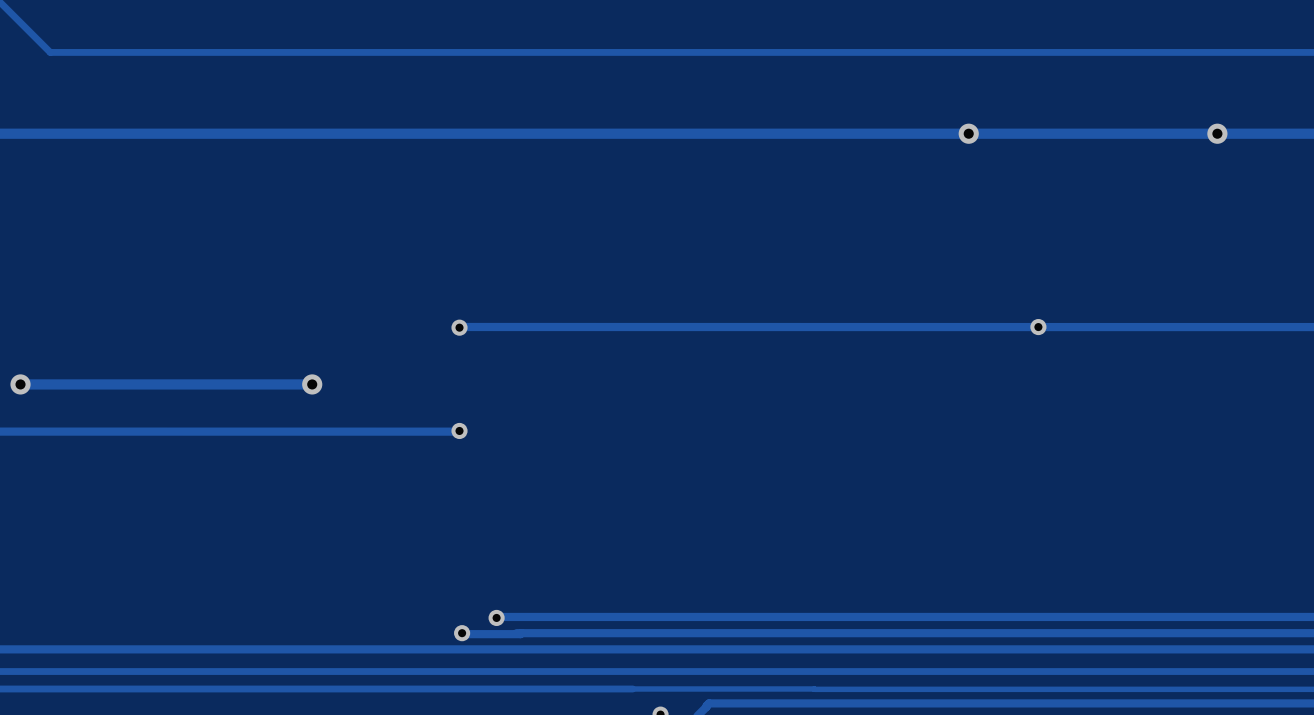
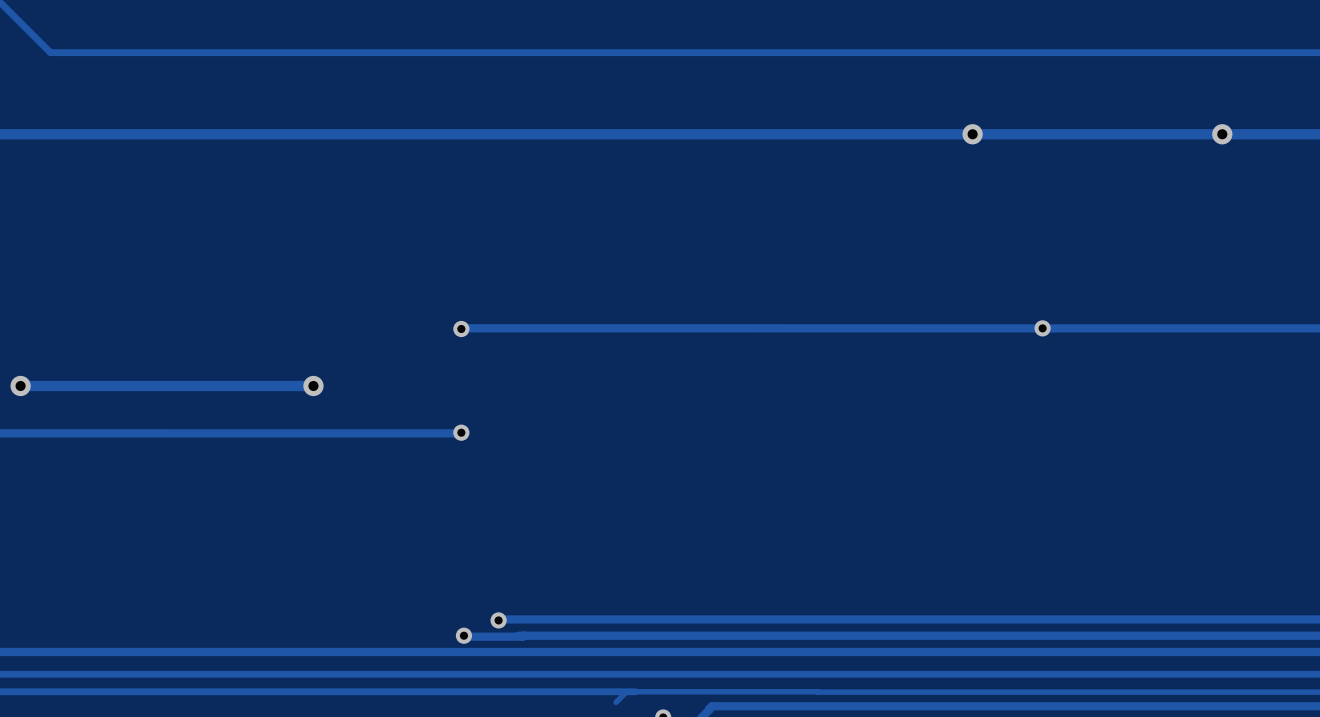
track: none -> (626, 691) (616, 702)

